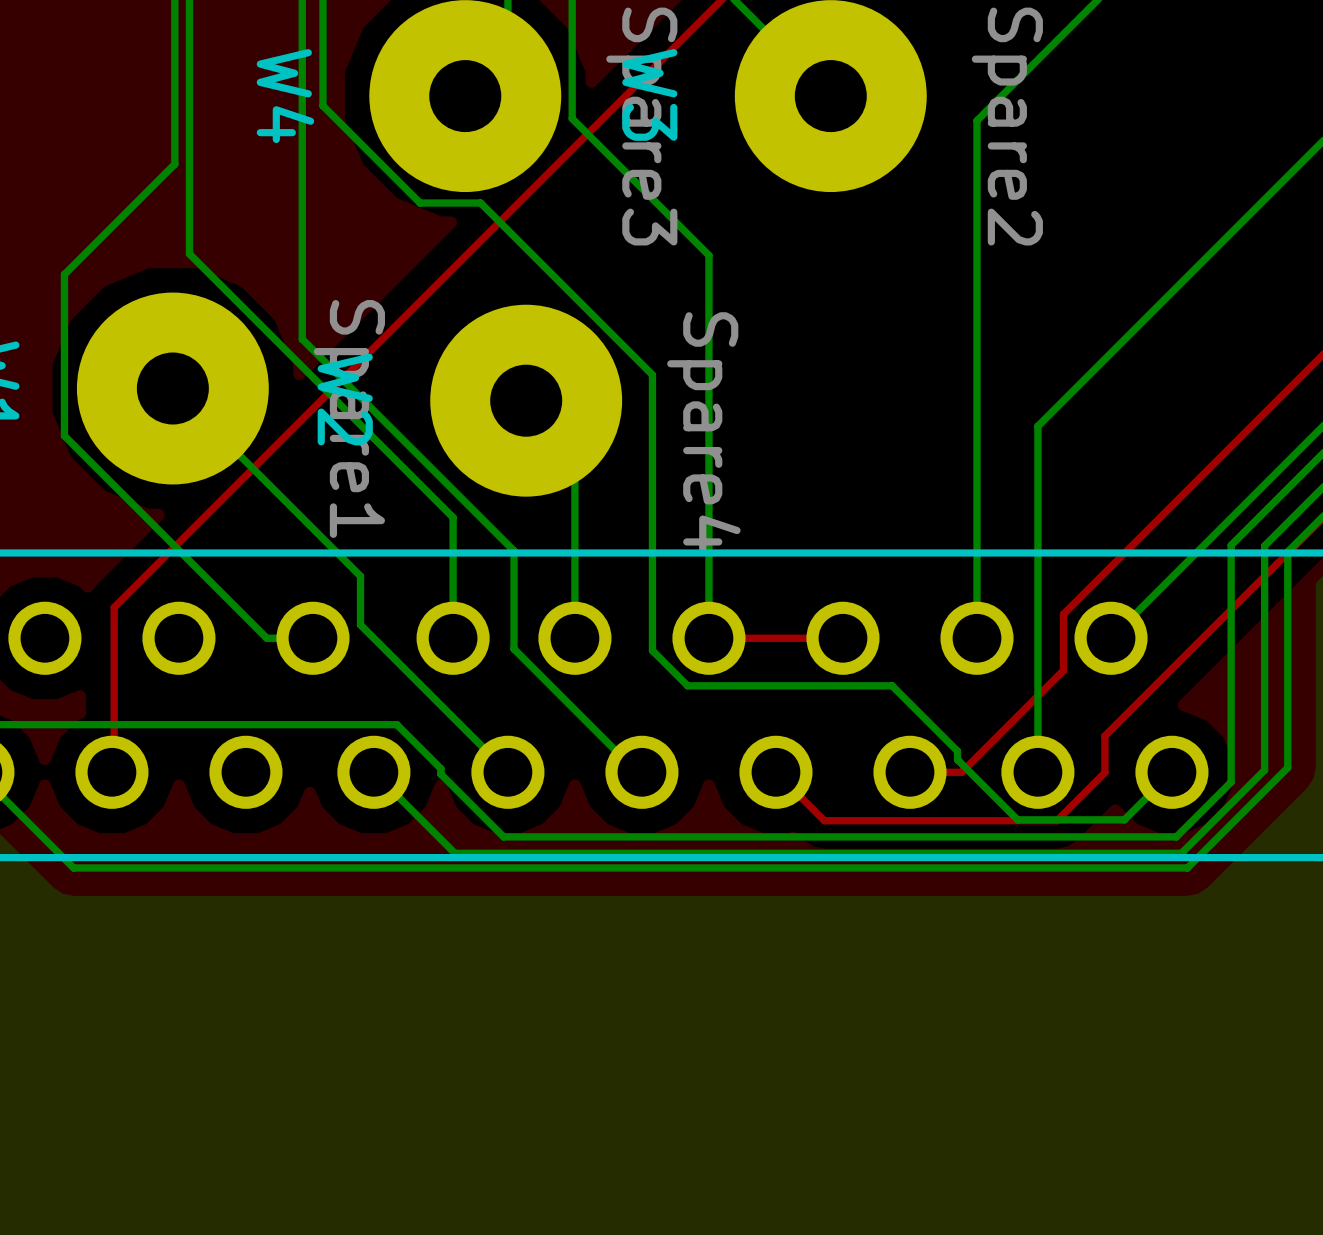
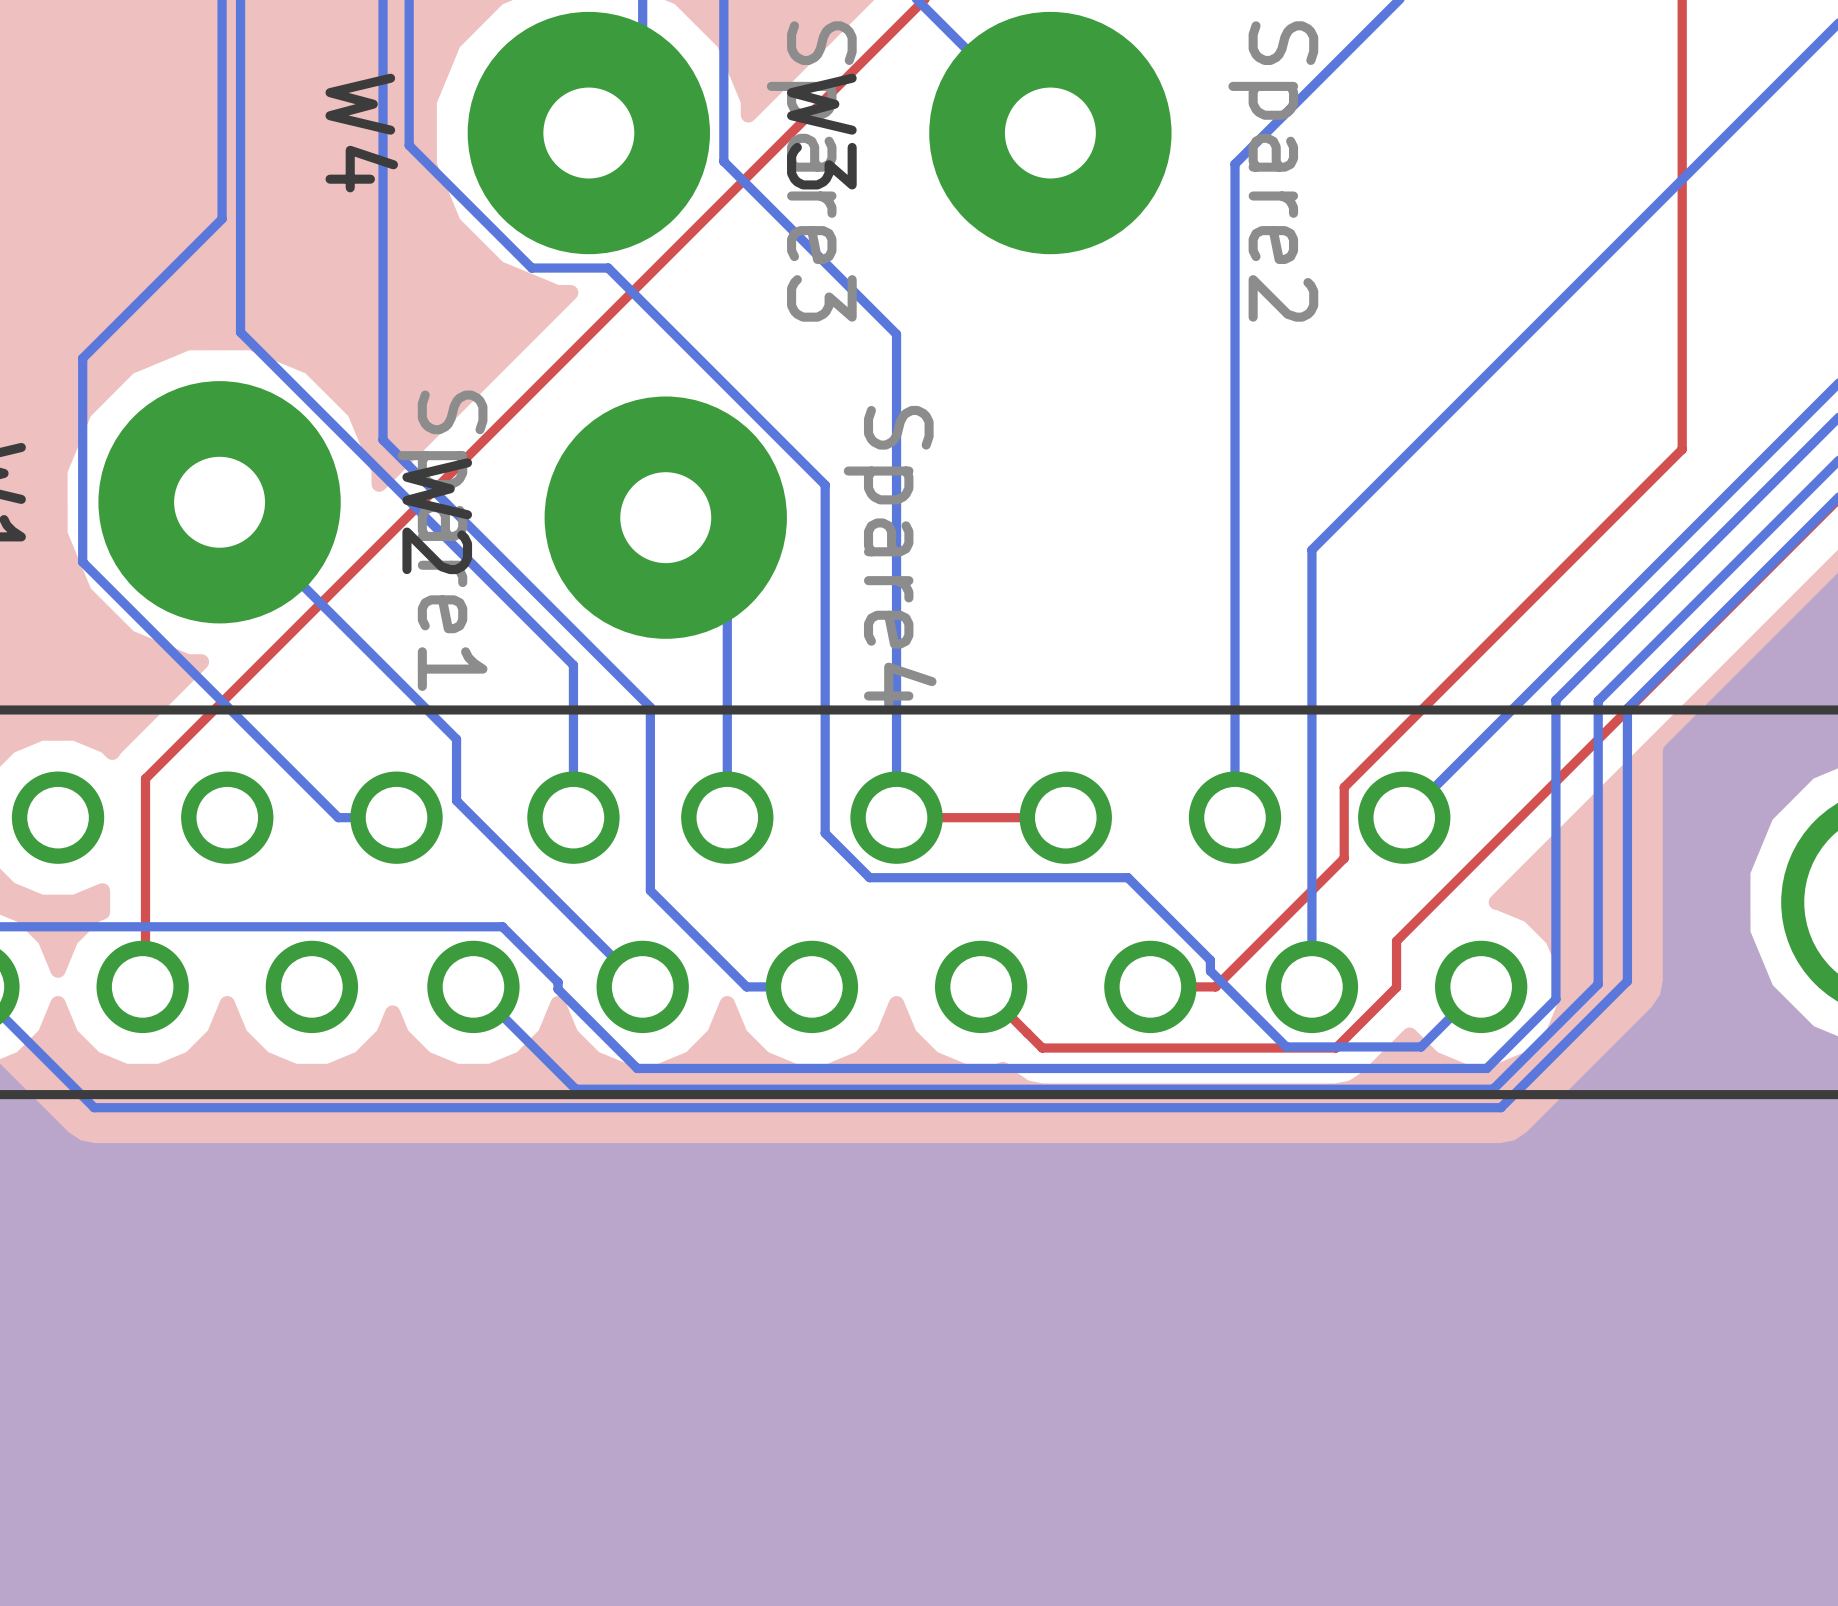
bottom track: (514, 648) (637, 772) -> (650, 831) (650, 890) (746, 986) (806, 986)

